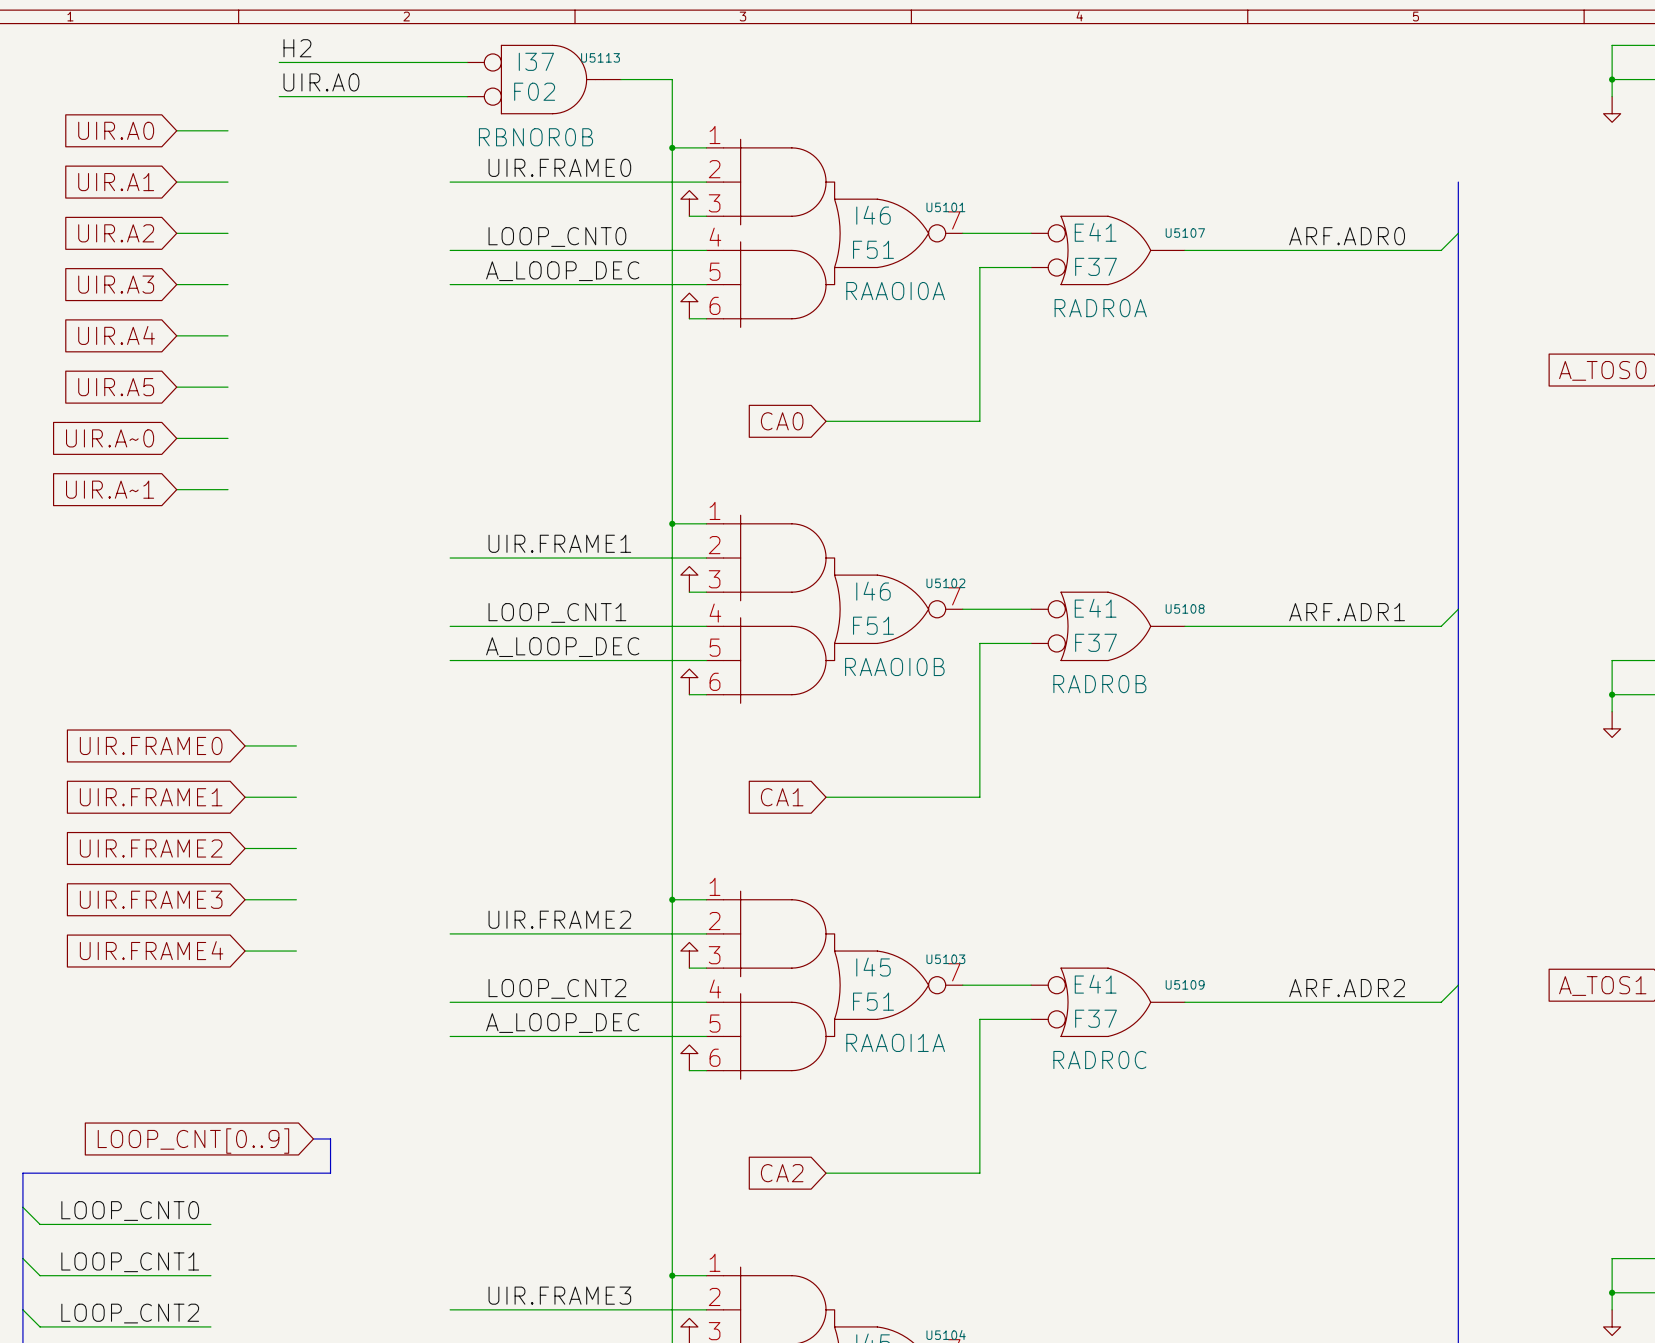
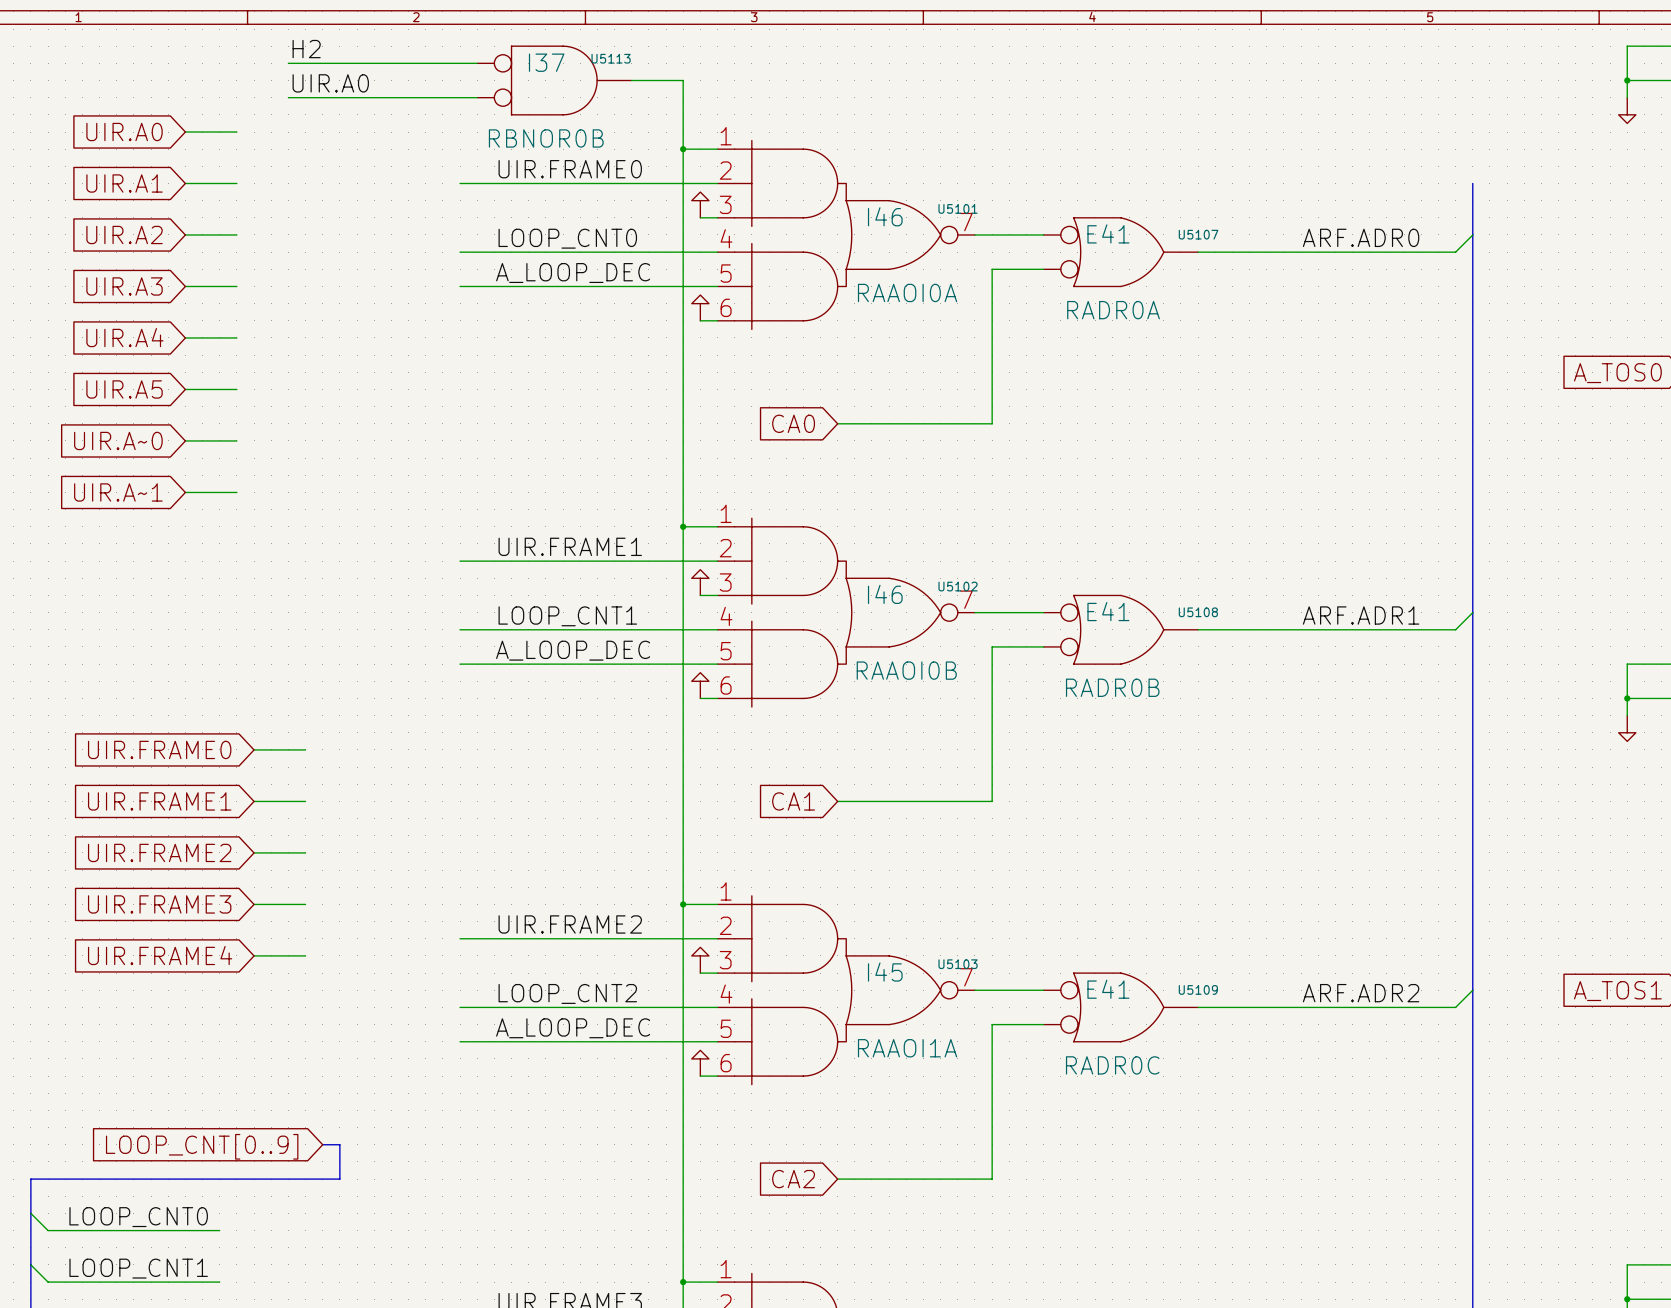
U5113 value: F02 (534, 91) -> none
U5101 value: F51 (873, 249) -> none
U5107 value: F37 (1096, 266) -> none
U5102 value: F51 (873, 625) -> none
U5108 value: F37 (1096, 642) -> none
U5103 value: F51 (873, 1001) -> none
U5109 value: F37 (1096, 1018) -> none

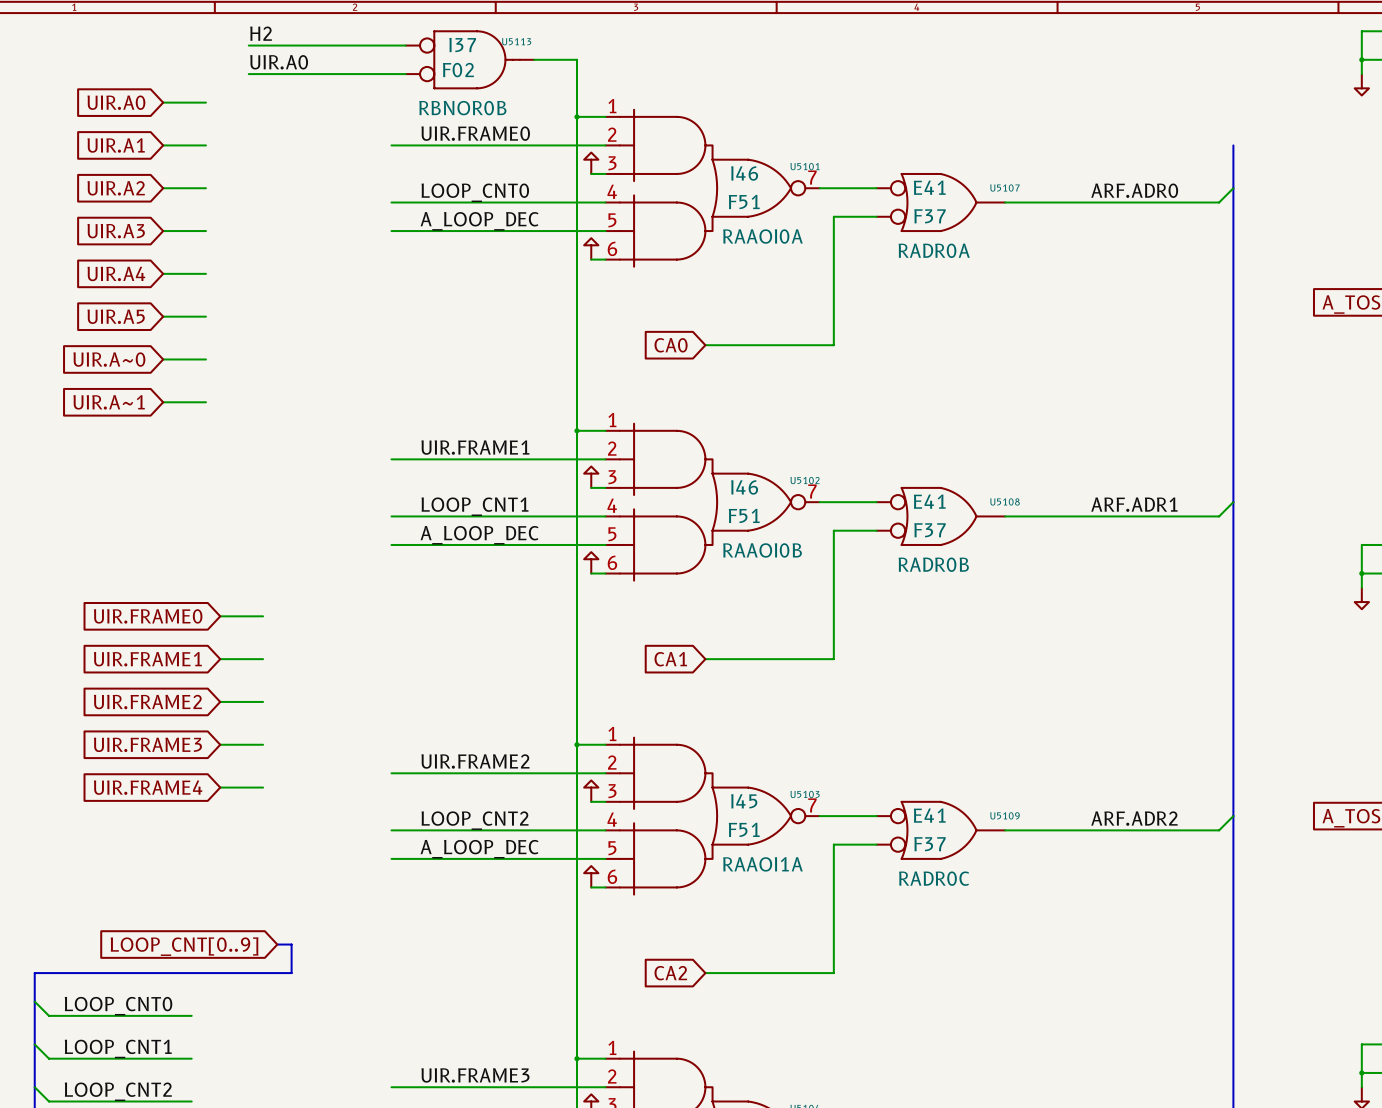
U5113 value: none -> F02 (458, 70)
U5101 value: none -> F51 (744, 201)
U5107 value: none -> F37 (929, 216)
U5102 value: none -> F51 (744, 515)
U5108 value: none -> F37 (929, 530)
U5103 value: none -> F51 (744, 829)
U5109 value: none -> F37 (929, 844)

